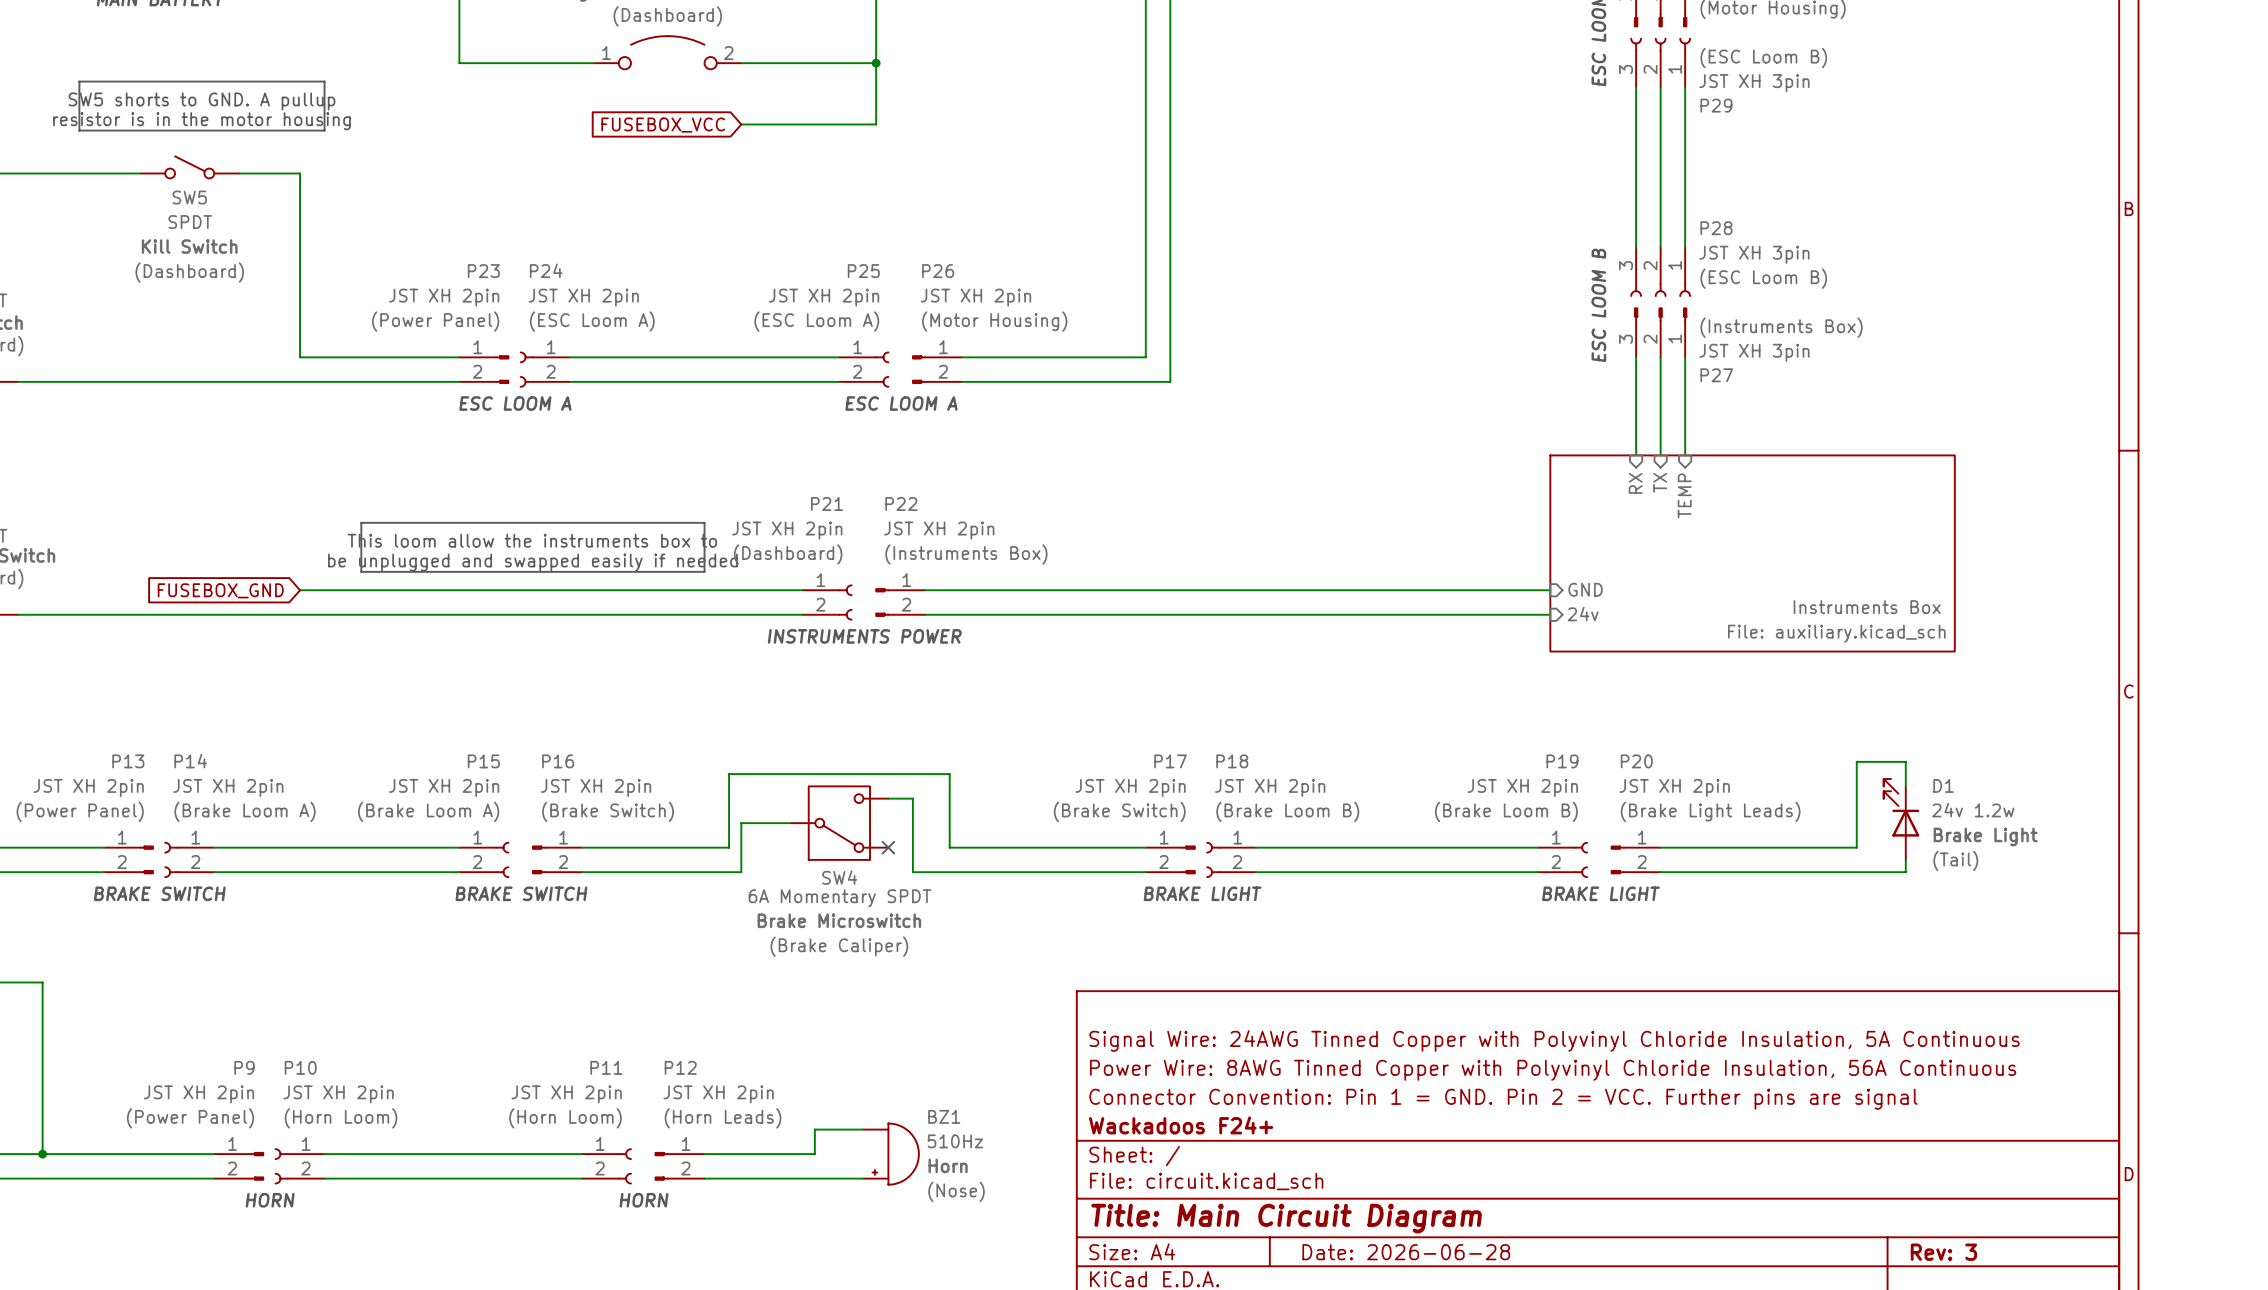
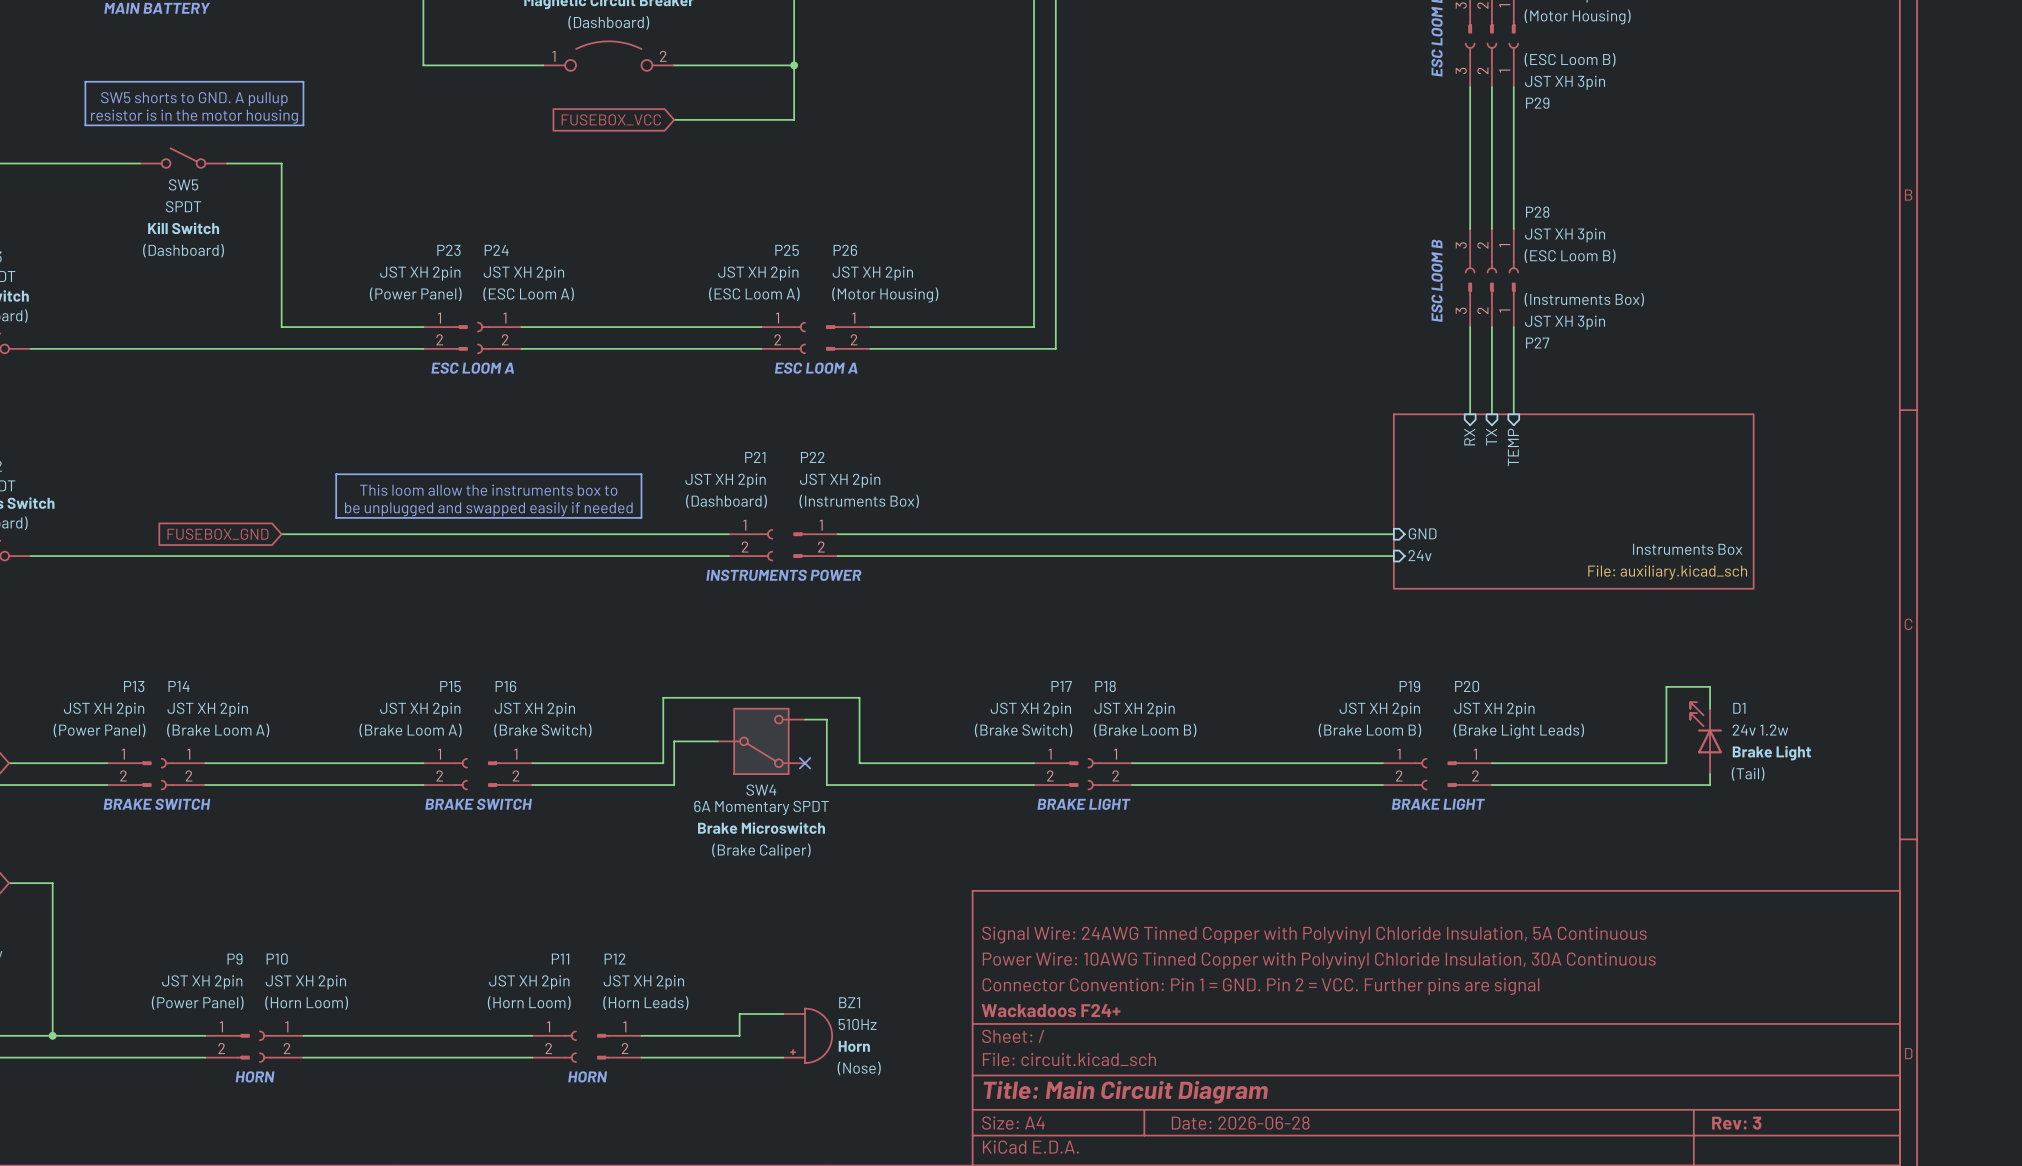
title block: Power Wire: 8AWG Tinned Copper with Polyvinyl Chloride Insulation, 56A Continuous (1553, 1070) -> Power Wire: 10AWG Tinned Copper with Polyvinyl Chloride Insulation, 30A Continuous (1319, 960)

